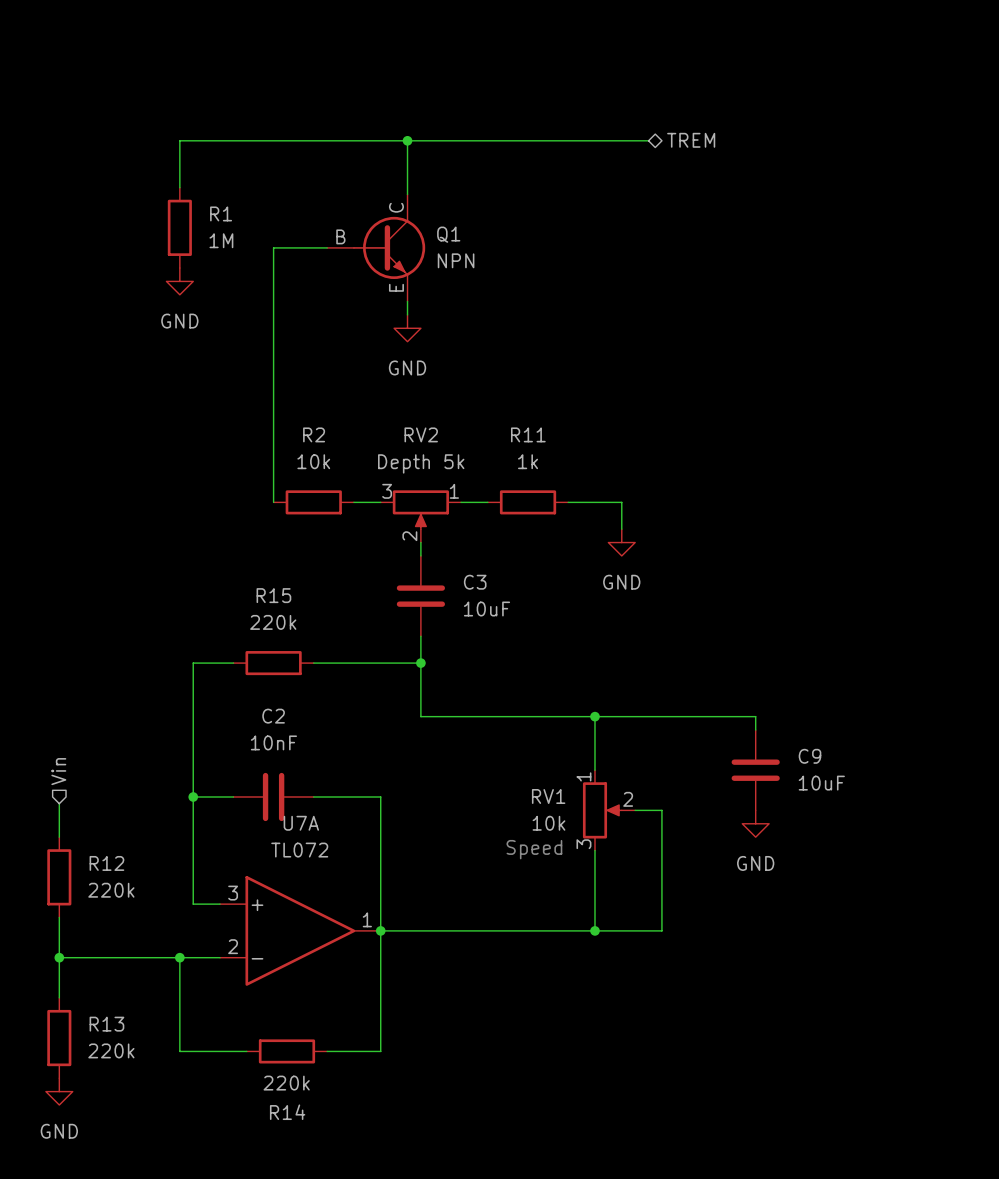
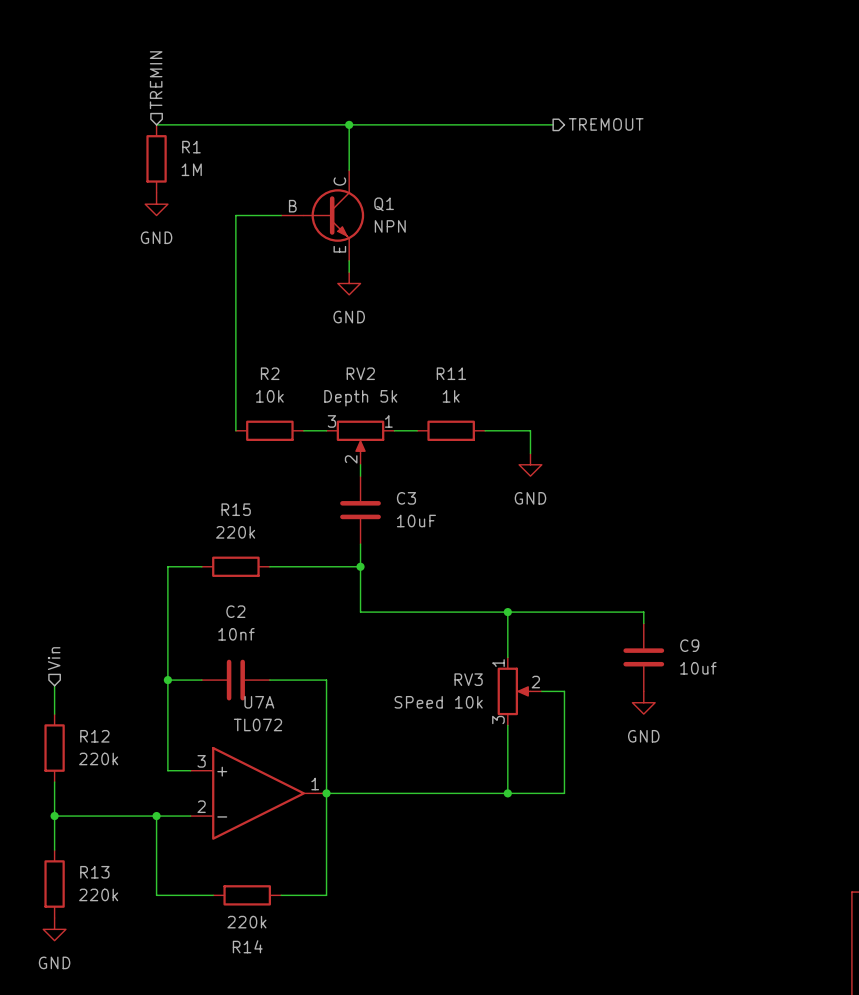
hierarchical label: none -> TREMIN (156, 80)
wire: (179, 140) (179, 187) -> none
hierarchical label shape: bidirectional (691, 140) -> output (606, 124)
hierarchical label: TREM (691, 140) -> TREMOUT (606, 124)
R1 position: (179, 227) -> (156, 158)
power symbol position: GND (179, 281) -> GND (156, 204)
C2 value: 10nF (273, 742) -> 10nf (236, 634)
C9 value: 10uF (821, 783) -> 10uf (698, 668)
RV1 name: RV1 (548, 796) -> RV3 (468, 679)
RV1 value: 10k (548, 823) -> SPeed 10k (438, 702)
text: Speed (534, 849) -> none

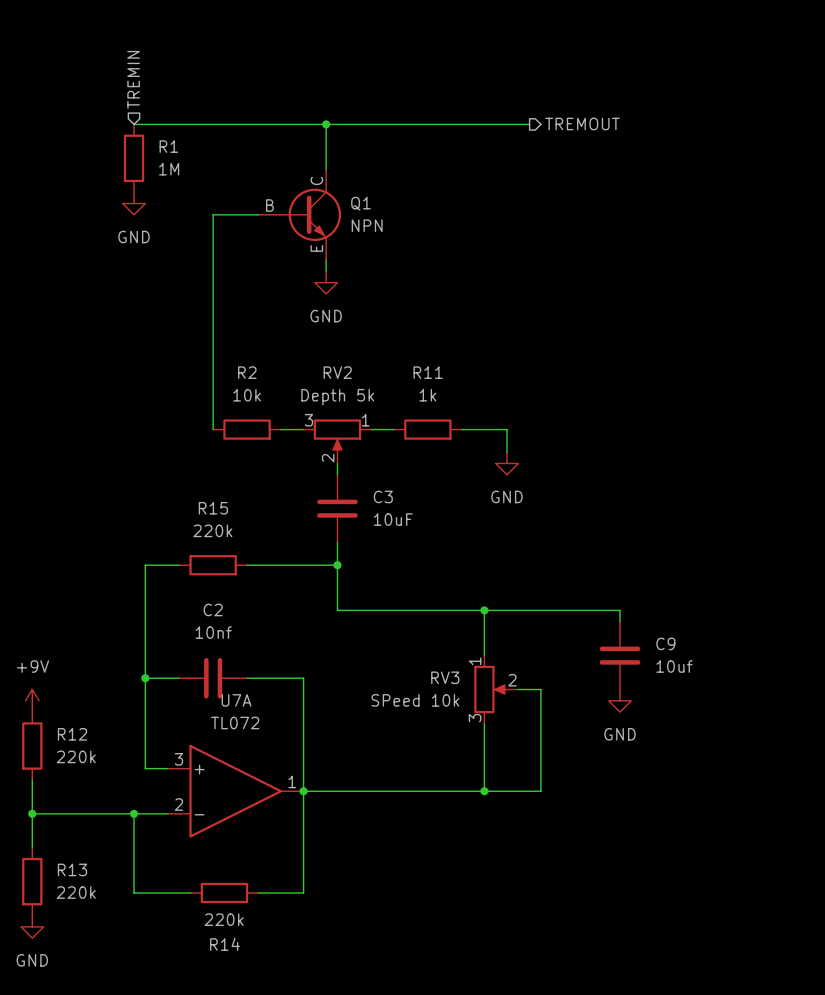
hierarchical label: Vin (54, 658) -> none
power symbol: none -> +9V (32, 700)

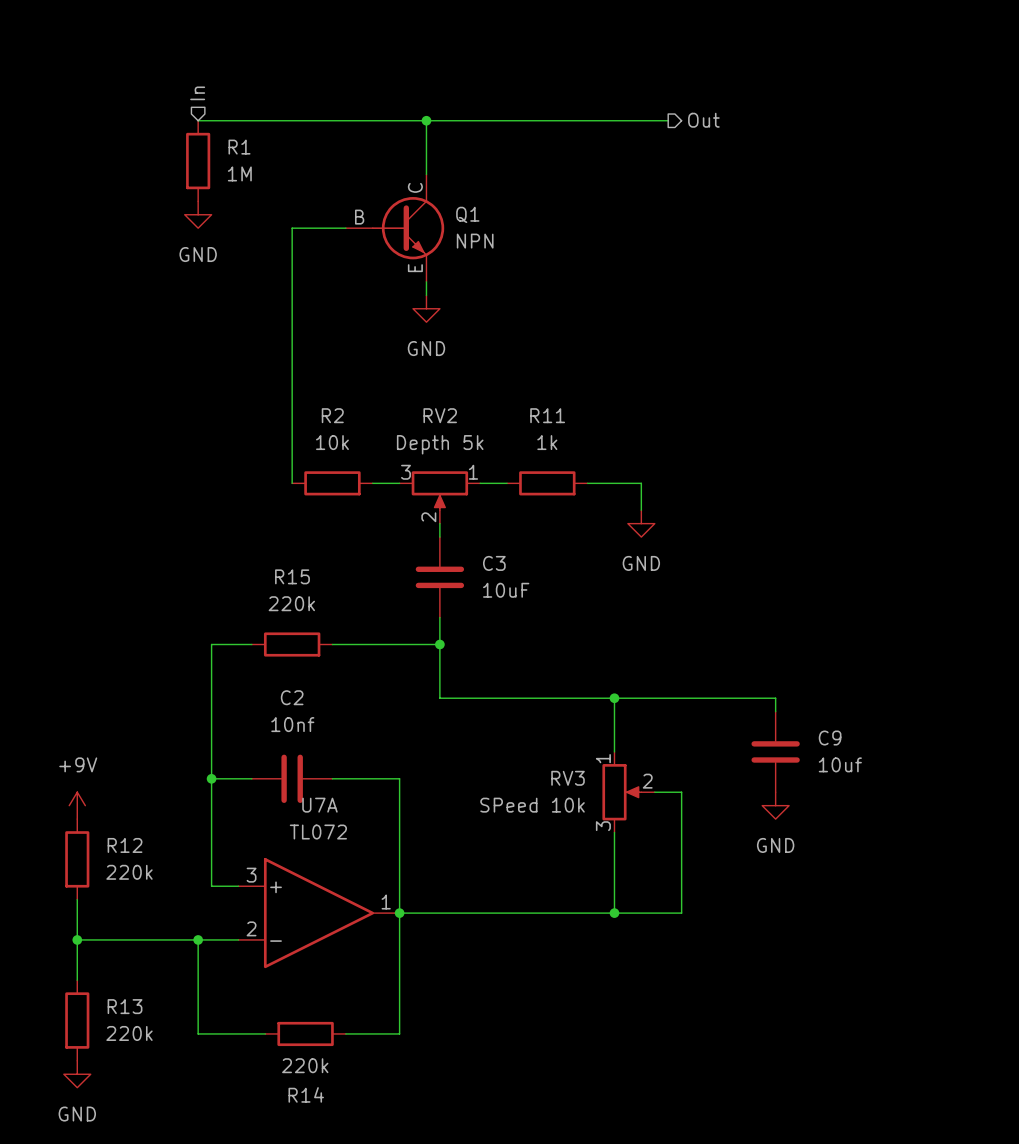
hierarchical label: TREMIN (133, 79) -> In (197, 93)
hierarchical label: TREMOUT (582, 123) -> Out (703, 120)

